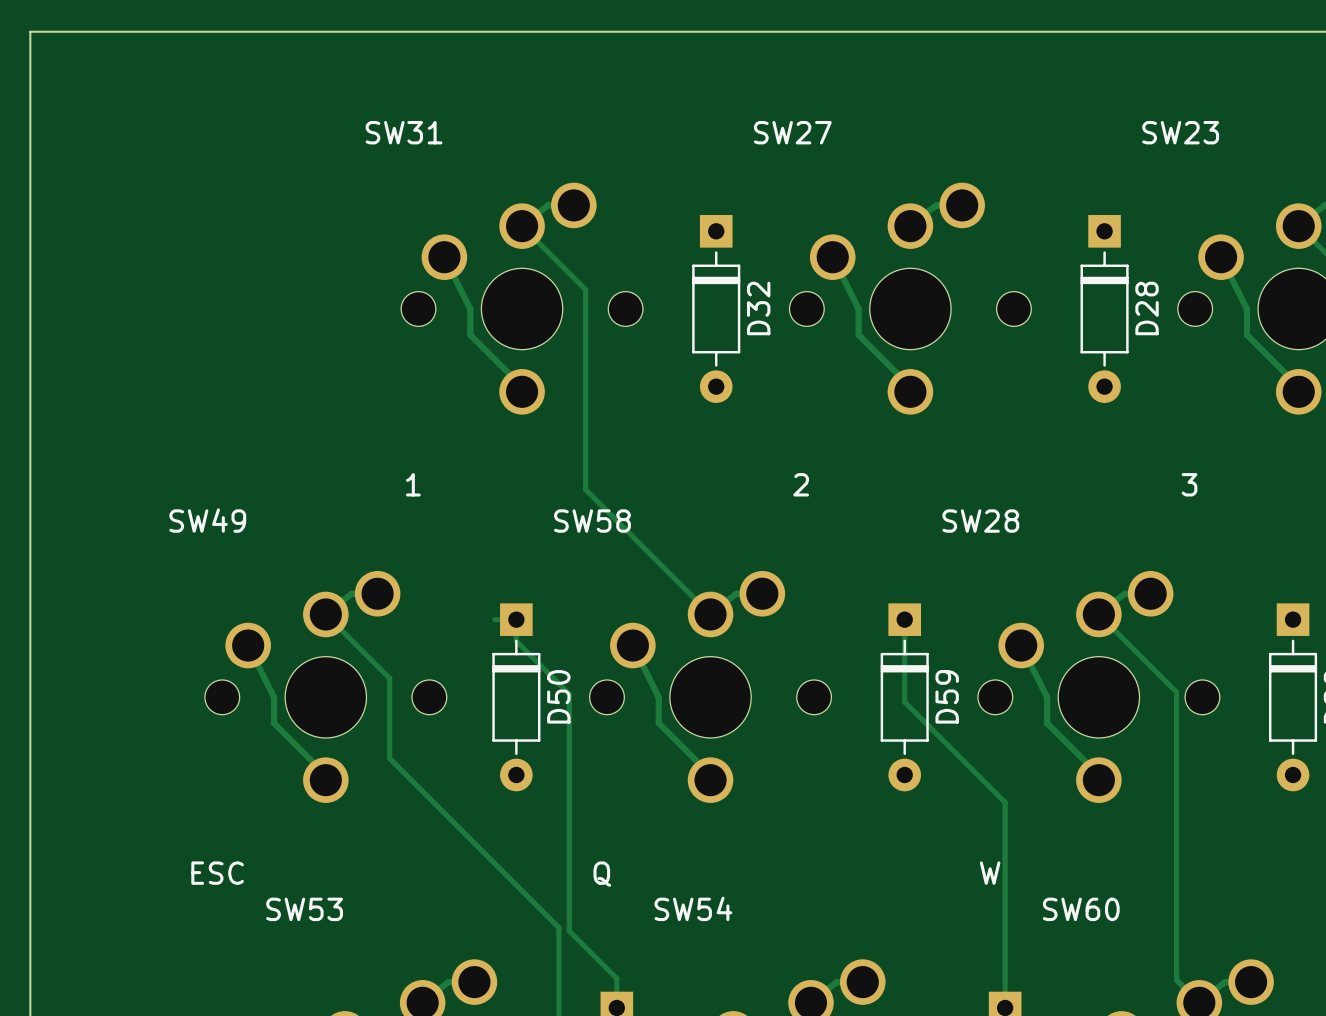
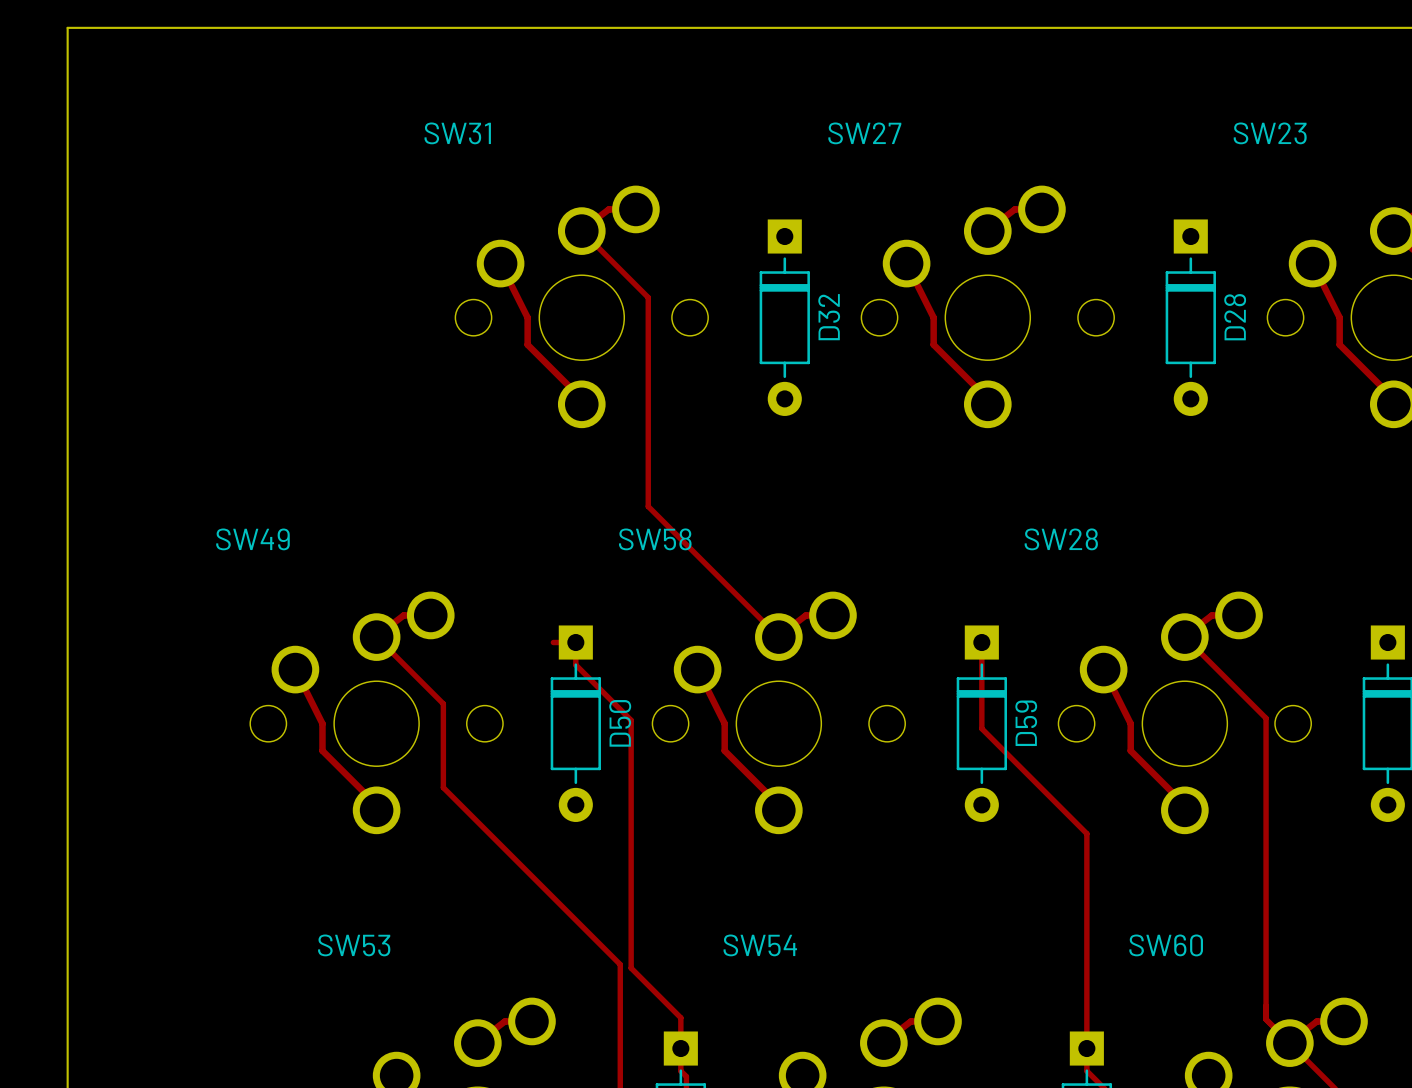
SW31 value: 1 (413, 484) -> none
SW27 value: 2 (801, 484) -> none
SW23 value: 3 (1189, 484) -> none
SW49 value: ESC (217, 873) -> none
SW28 value: W (990, 873) -> none
SW58 value: Q (602, 874) -> none

